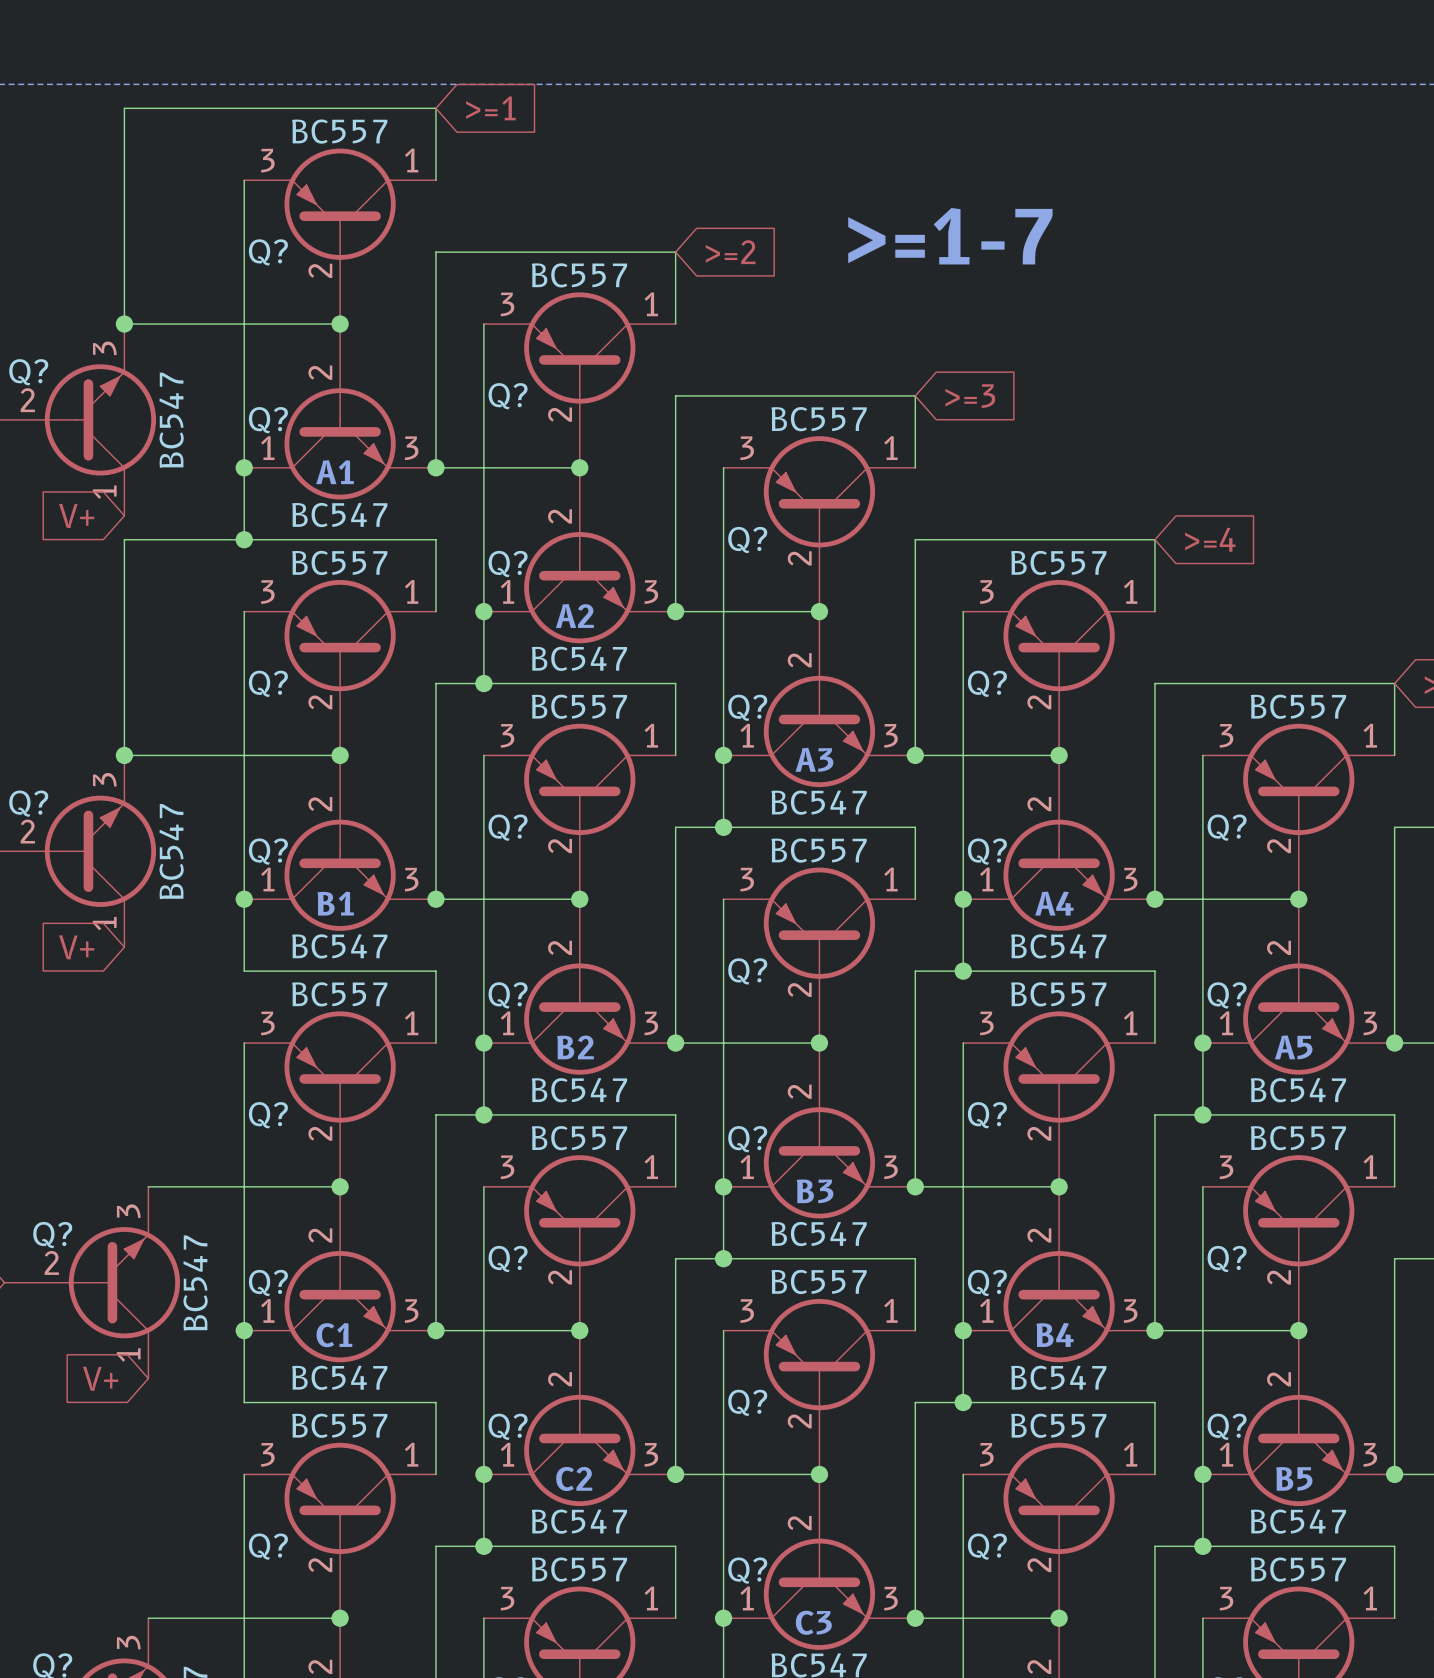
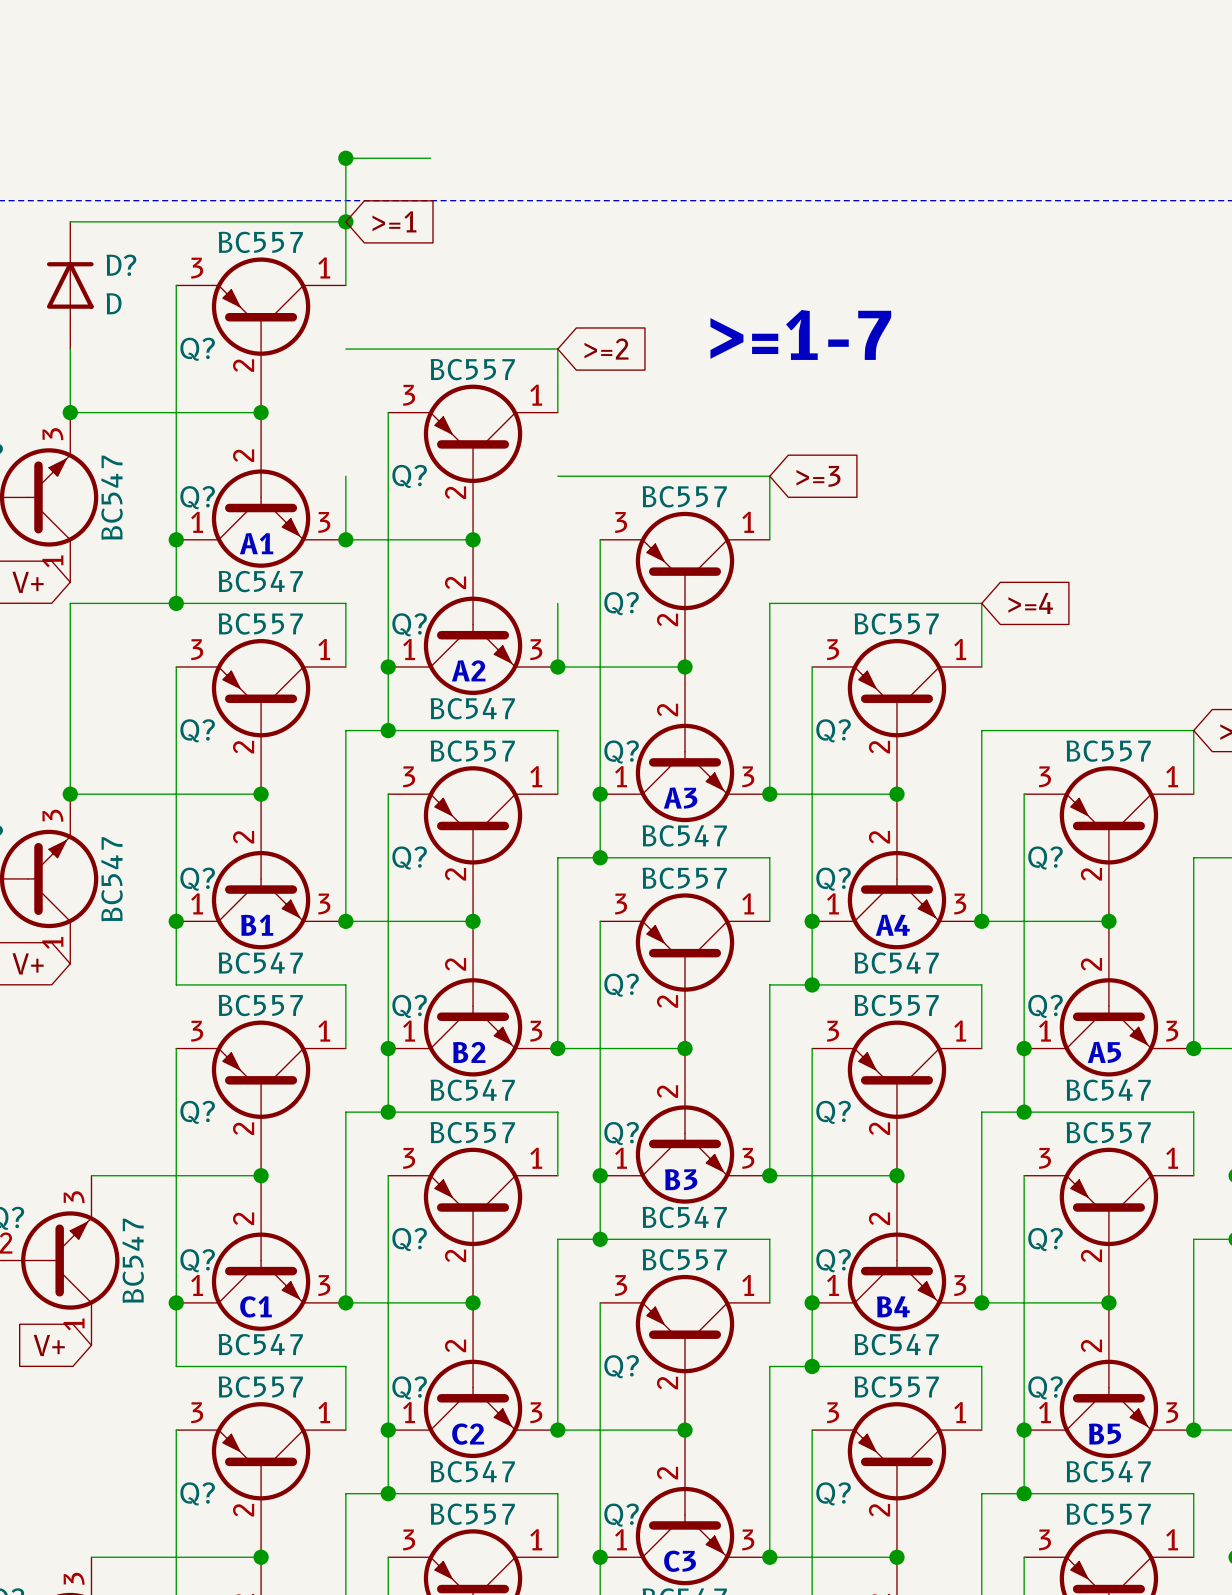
junction: none -> (345, 158)
wire: none -> (430, 158) (345, 158) (345, 221)
junction: none -> (345, 221)
D?: none -> D (70, 285)
wire: (435, 252) (435, 395) -> none
wire: (675, 395) (675, 539) -> none

